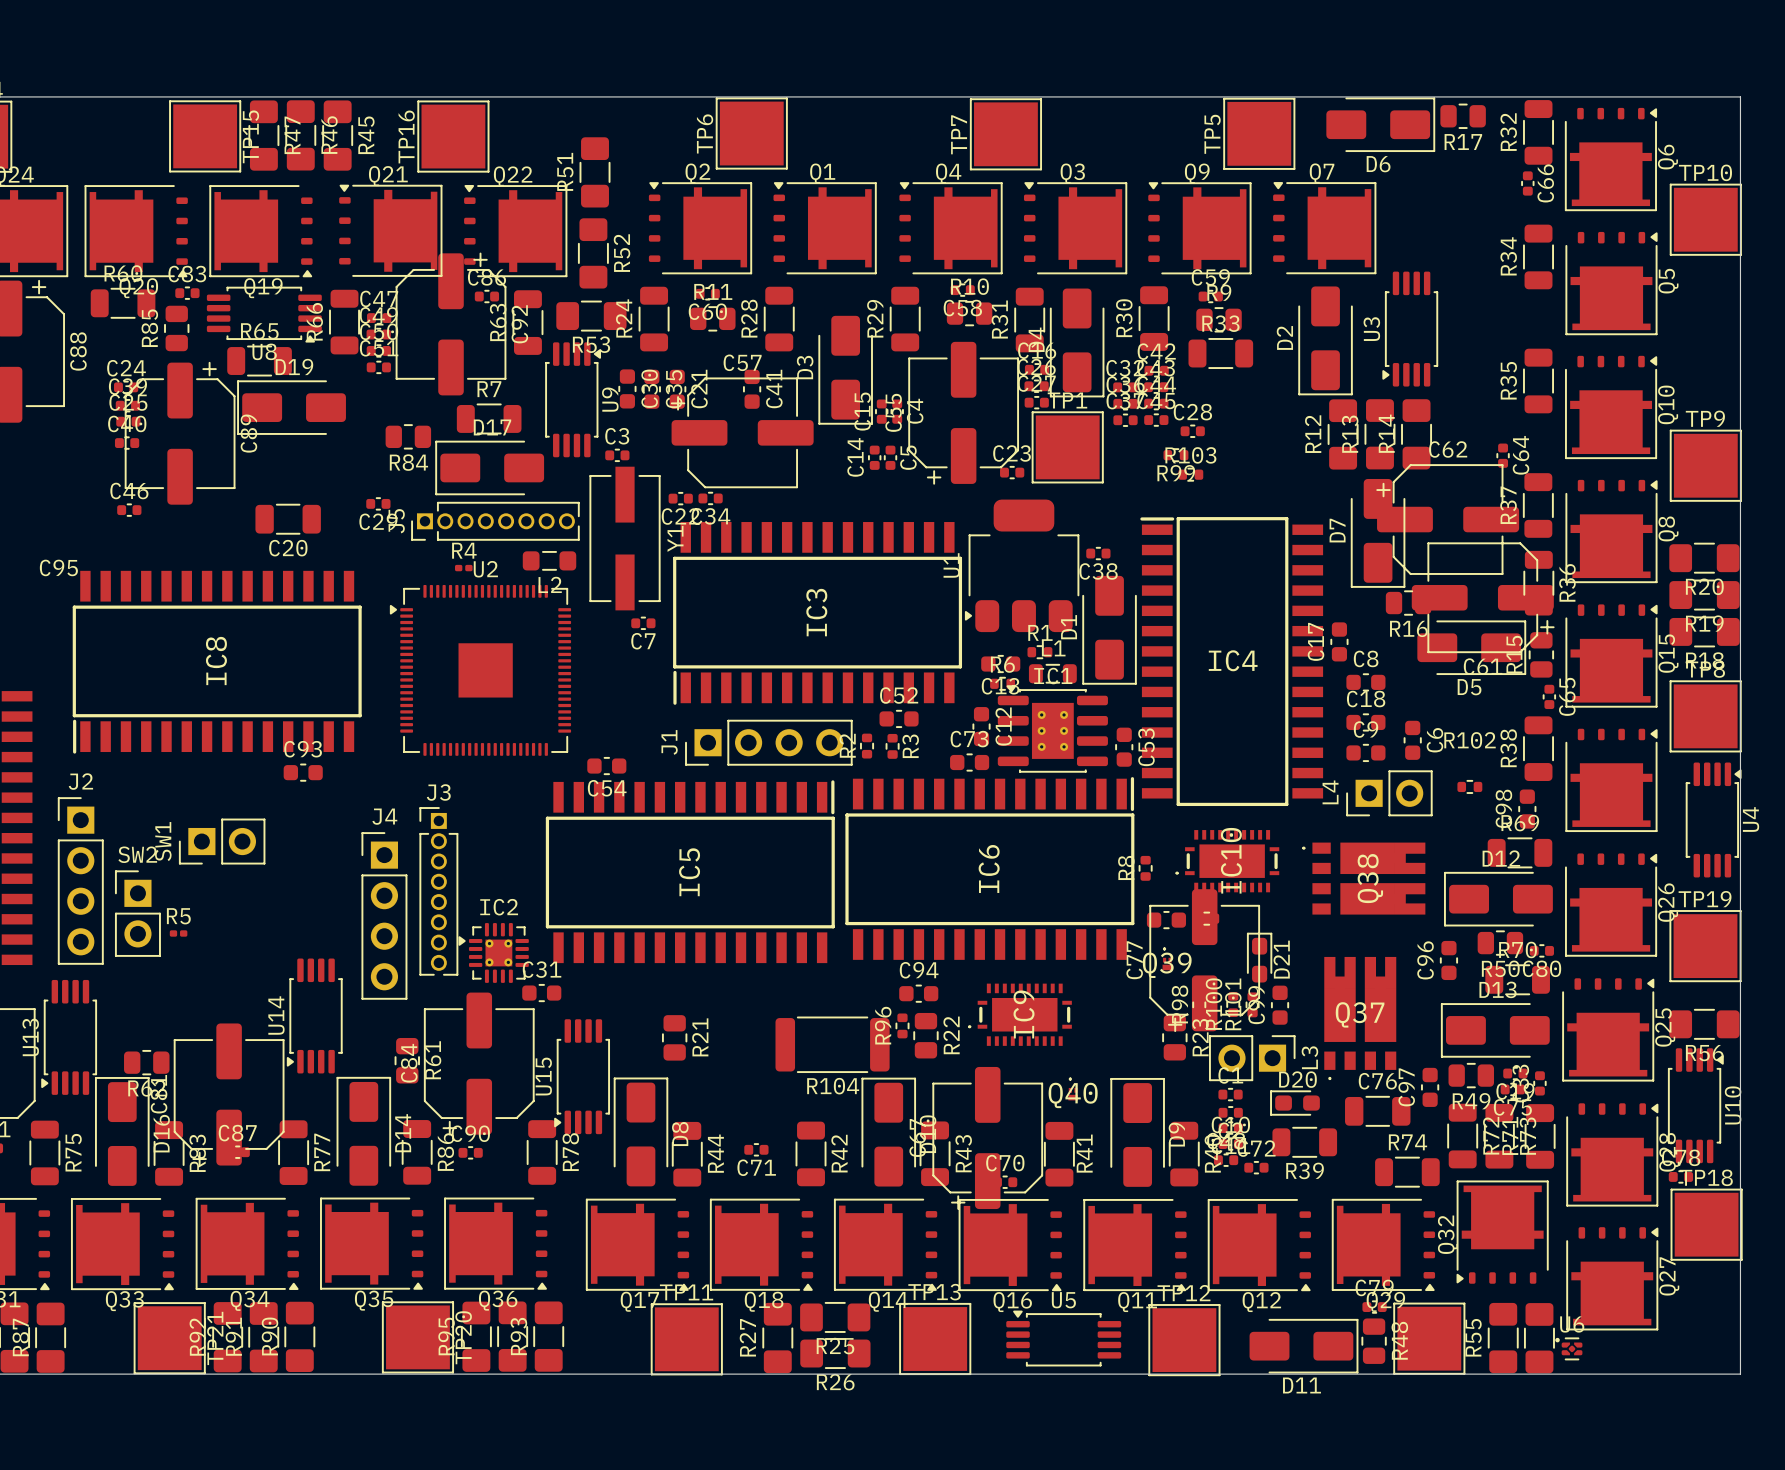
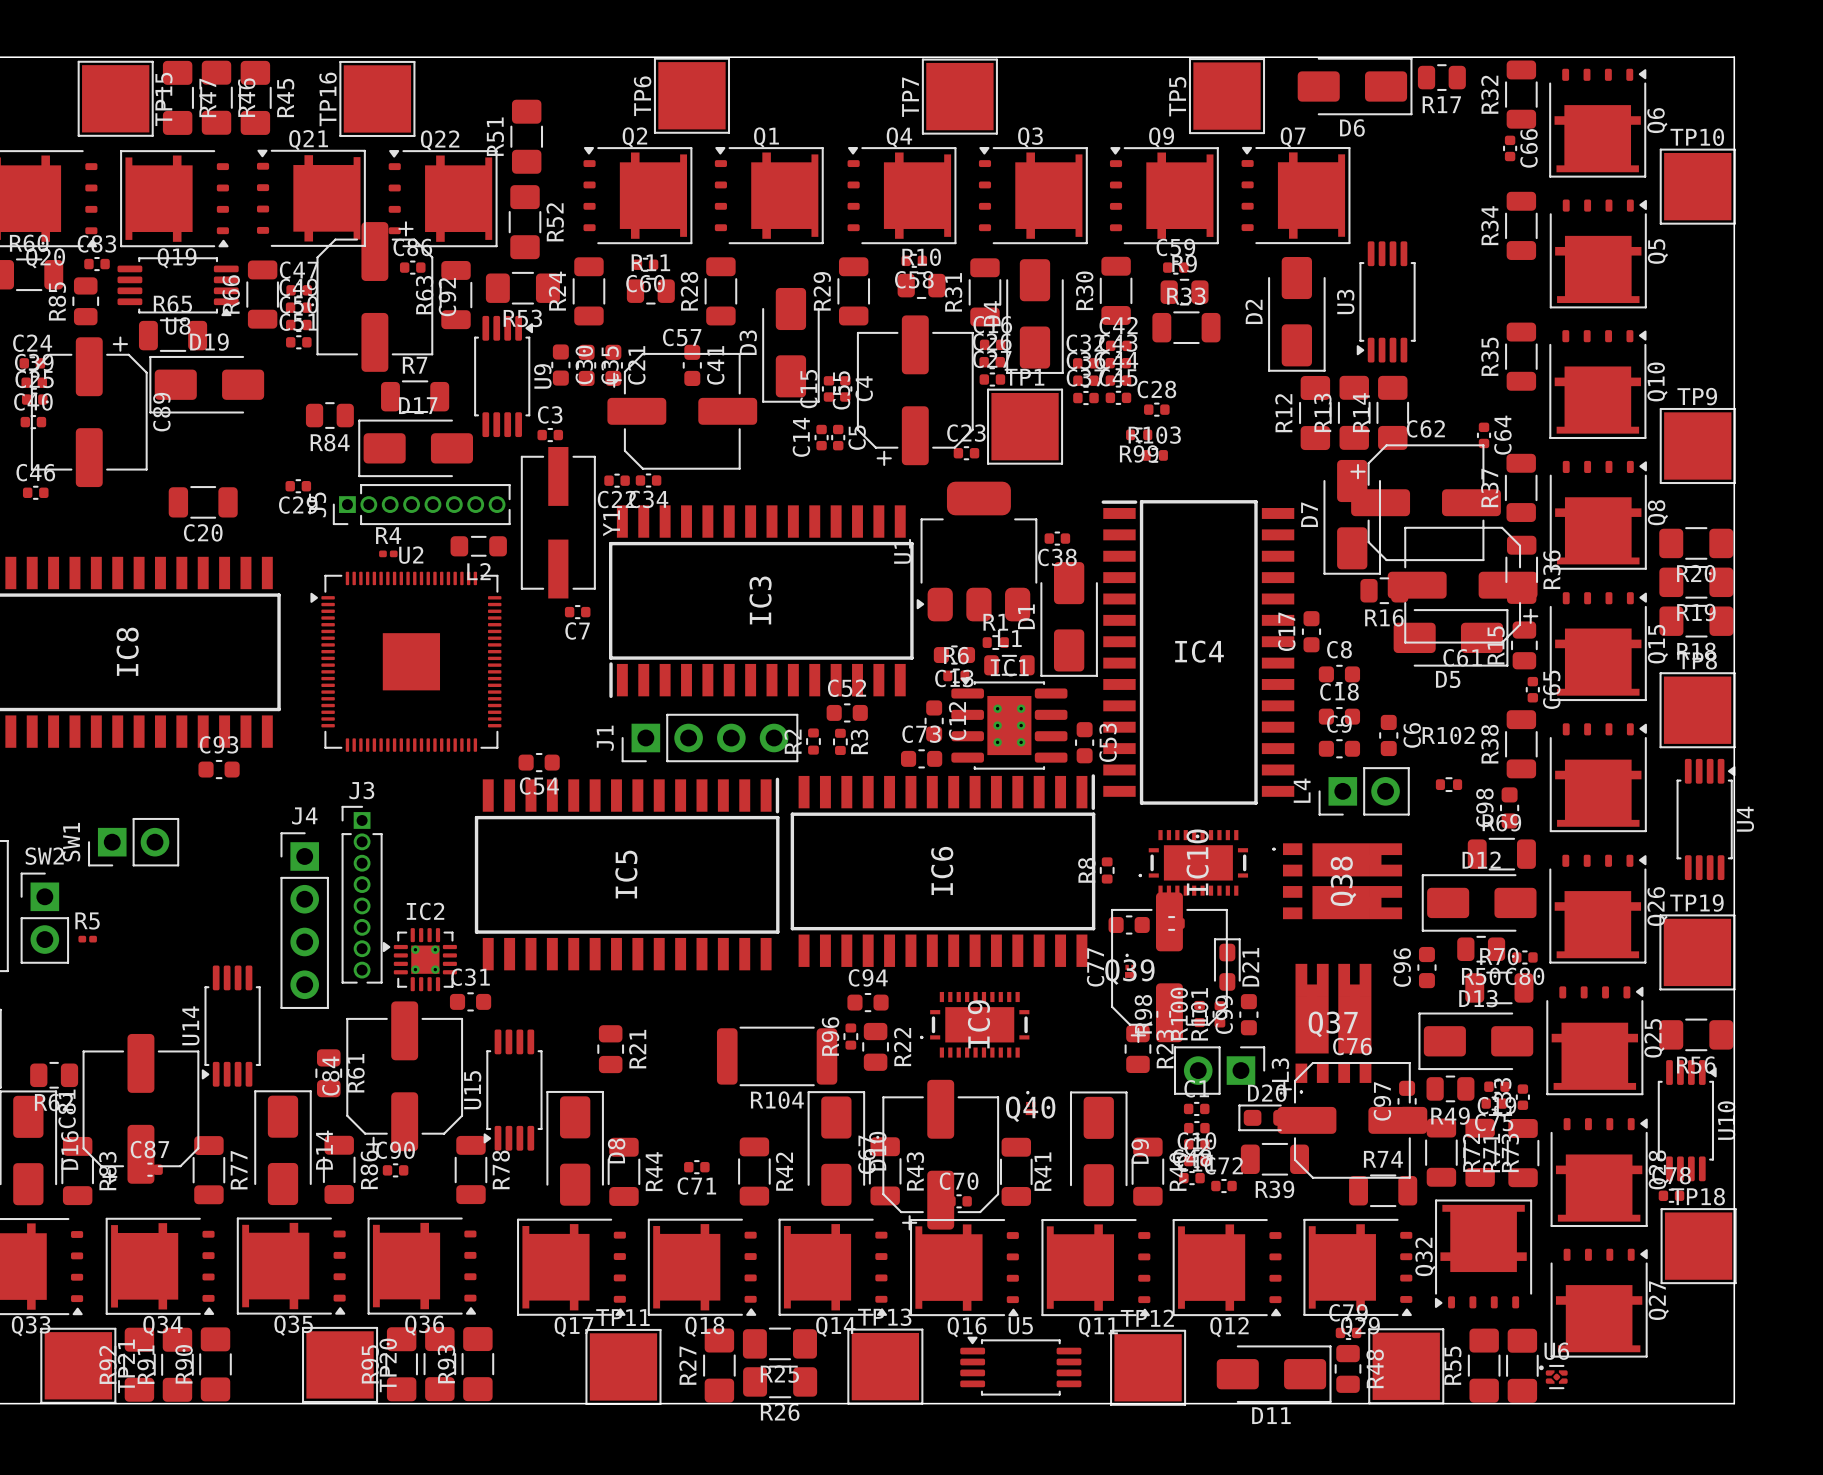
C76 name position: C76 (1377, 1081) -> C76 (1352, 1046)
C76 footprint: [1345, 1095, 1411, 1127] -> [1276, 1061, 1428, 1179]

